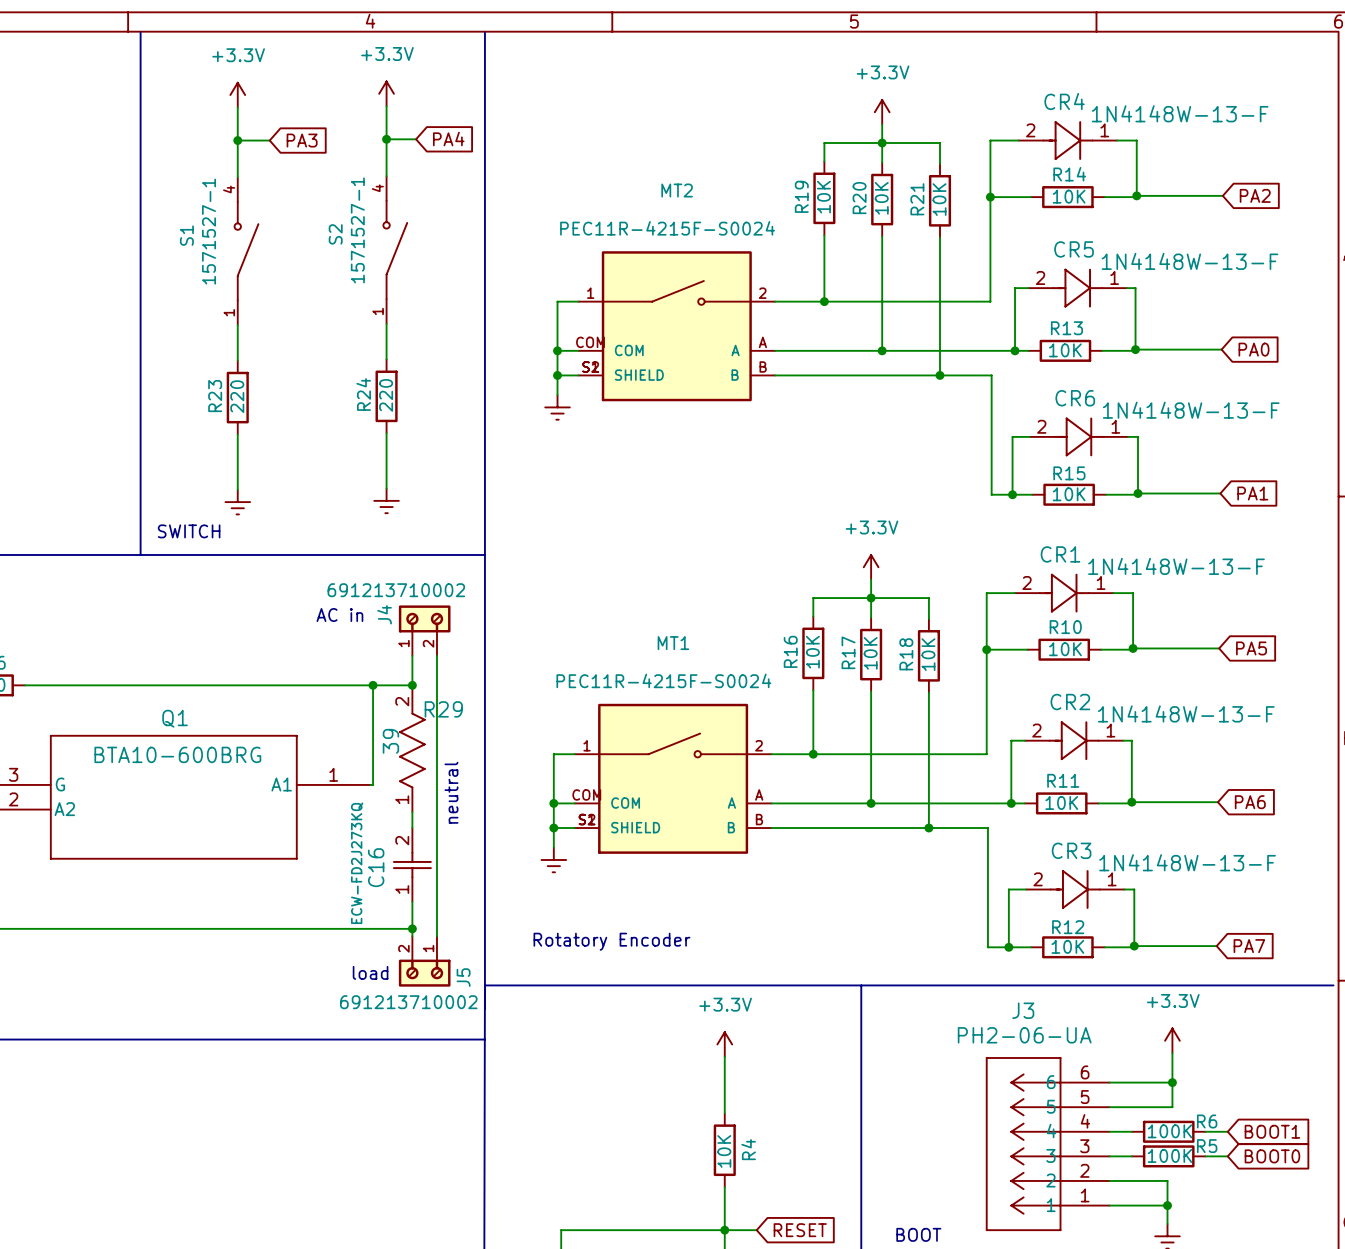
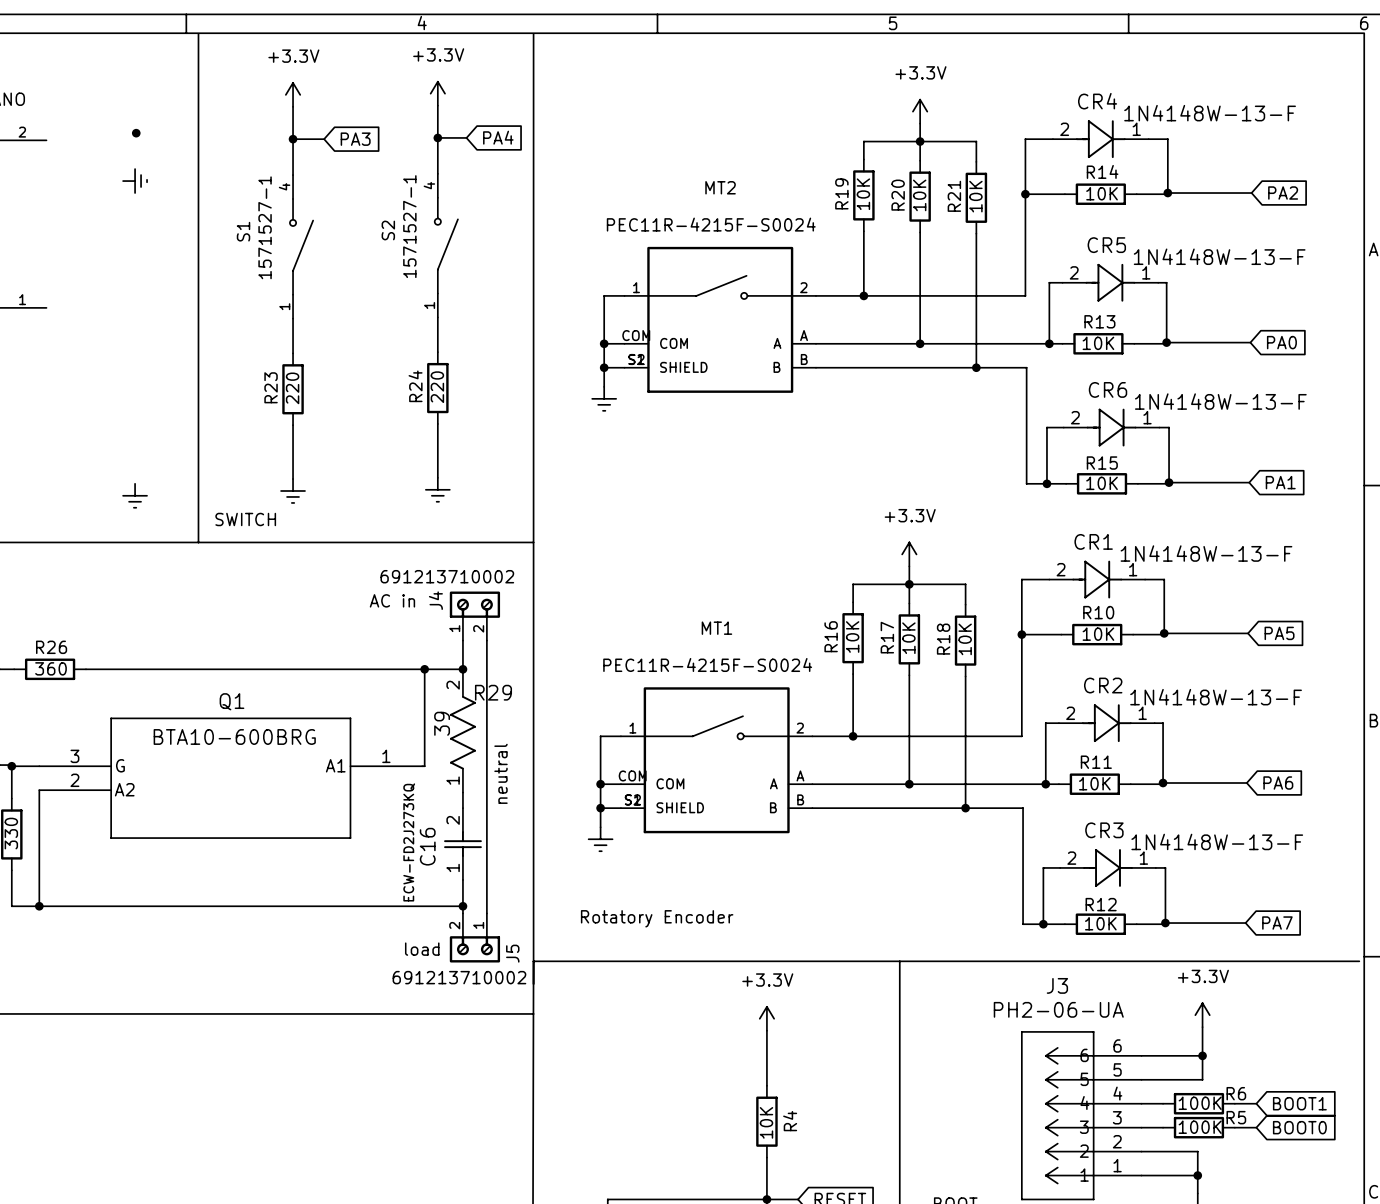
junction: none -> (136, 133)
power symbol: none -> (135, 181)
power symbol: none -> (135, 495)

